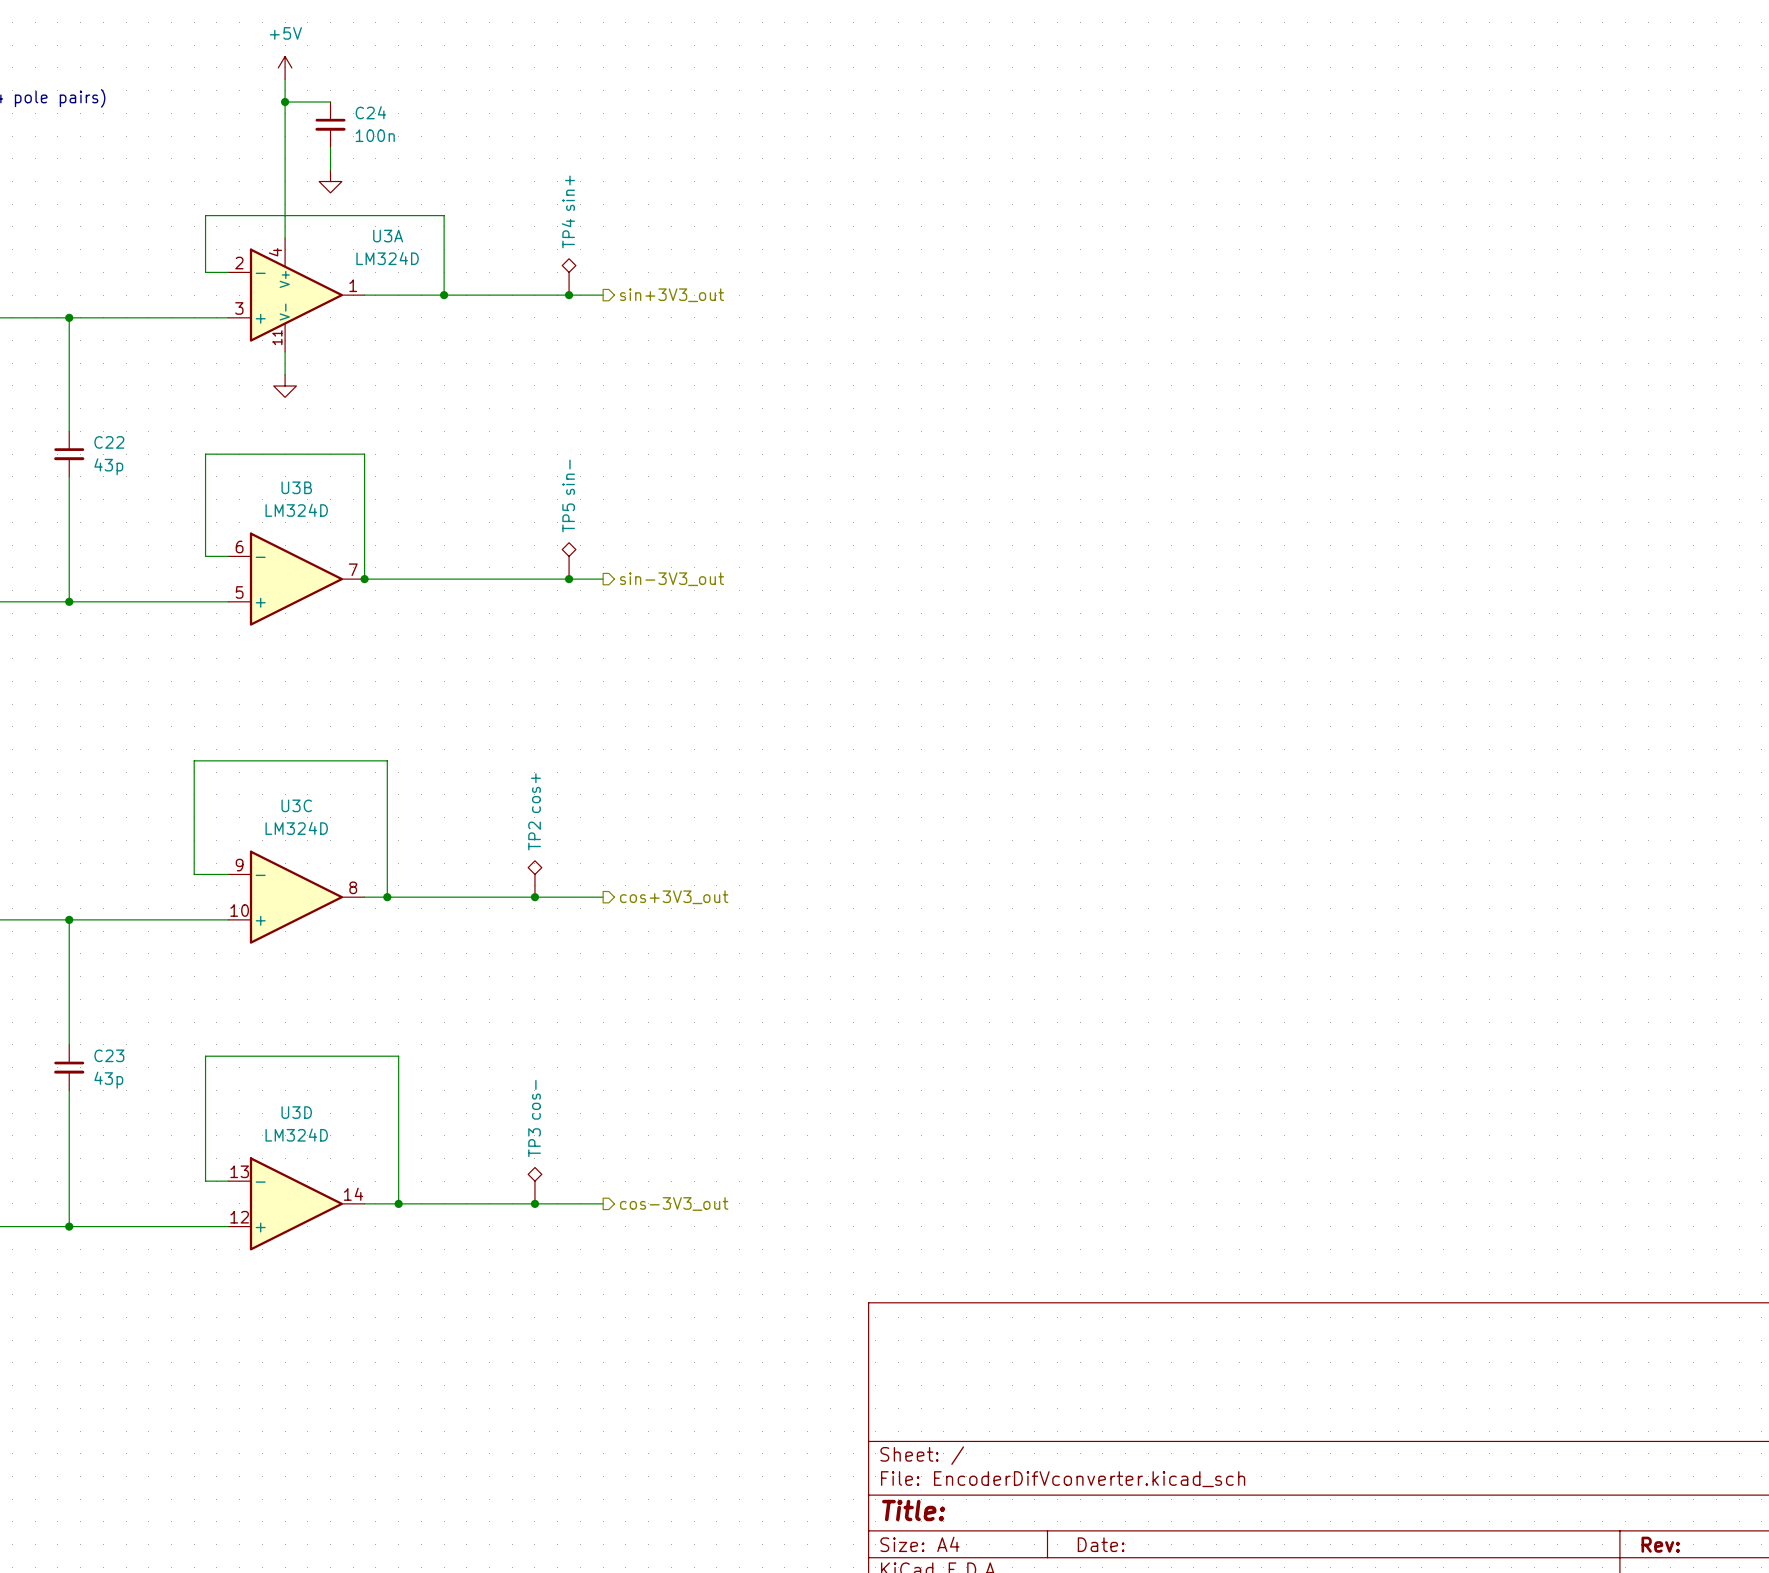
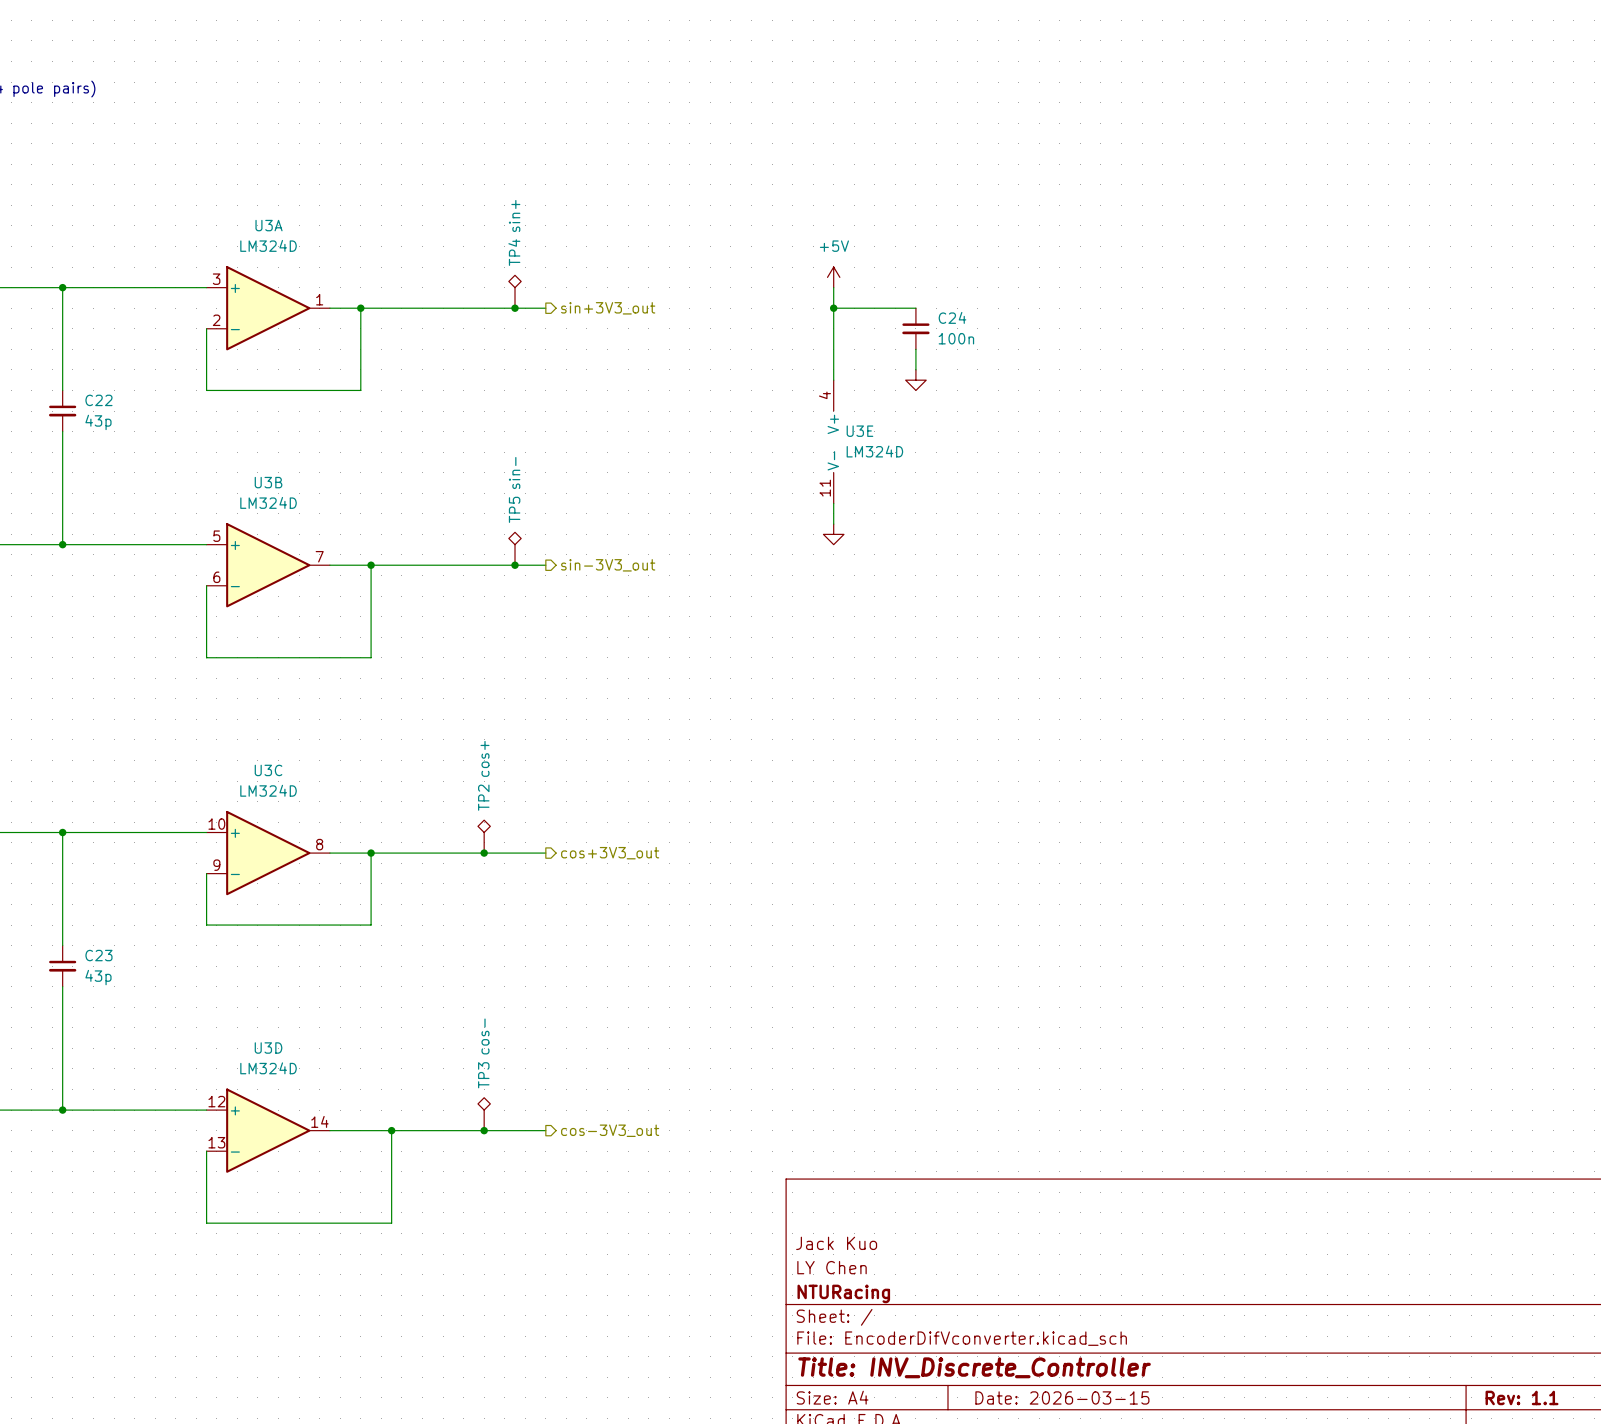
power symbol: +5V (285, 67) -> none
wire: (285, 79) (285, 238) -> none
wire: (285, 102) (330, 102) -> none
junction: (285, 102) -> none
C24 position: (330, 124) -> (915, 328)
wire: (330, 147) (330, 170) -> none
power symbol: (330, 181) -> none
U3A name position: U3A (388, 236) -> U3A (269, 225)
U3A symbol: [228, 238, 365, 352] -> [206, 266, 330, 351]
U3A value position: LM324D (387, 258) -> LM324D (268, 245)
wire: (228, 272) (205, 272) (205, 215) (444, 215) (444, 295) -> none
TP4 position: (569, 276) -> (515, 291)
wire: (364, 295) (603, 295) -> (329, 308) (545, 308)
junction: (444, 295) -> none
junction position: (569, 295) -> (515, 308)
hierarchical label position: sin+3V3_out (672, 295) -> sin+3V3_out (608, 308)
power symbol: none -> +5V (833, 277)
wire: none -> (833, 287) (833, 380)
wire: none -> (360, 308) (360, 390) (206, 390) (206, 328)
junction: none -> (360, 308)
wire: none -> (833, 308) (915, 308)
junction: none -> (833, 308)
power symbol: (285, 385) -> none
wire: none -> (915, 349) (915, 369)
power symbol: none -> (915, 380)
U3E: none -> LM324D (833, 441)
wire: (228, 556) (205, 556) (205, 454) (364, 454) (364, 579) (603, 579) -> none
wire: none -> (833, 503) (833, 524)
TP5 position: (569, 560) -> (515, 548)
U3B flip: as is (296, 579) -> up-down (268, 565)
junction: (364, 579) -> none
junction position: (569, 579) -> (515, 565)
hierarchical label position: sin-3V3_out (672, 579) -> sin-3V3_out (608, 565)
power symbol: none -> (833, 534)
wire: none -> (329, 565) (545, 565)
wire: none -> (371, 565) (371, 657) (206, 657) (206, 585)
junction: none -> (371, 565)
wire: (228, 874) (194, 874) (194, 760) (387, 760) (387, 897) -> none
TP2 position: (534, 878) -> (484, 836)
U3C flip: as is (296, 897) -> up-down (268, 853)
wire: (364, 897) (603, 897) -> (329, 853) (545, 853)
junction position: (387, 897) -> (371, 853)
junction position: (534, 897) -> (484, 853)
hierarchical label position: cos+3V3_out (674, 897) -> cos+3V3_out (610, 853)
wire: none -> (371, 853) (371, 925) (206, 925) (206, 873)
wire: (228, 1181) (205, 1181) (205, 1056) (398, 1056) (398, 1203) -> none
TP3 position: (534, 1185) -> (484, 1114)
U3D flip: as is (296, 1203) -> up-down (268, 1130)
wire: (364, 1203) (603, 1203) -> (329, 1130) (545, 1130)
junction: (398, 1203) -> none
junction position: (534, 1203) -> (484, 1130)
hierarchical label position: cos-3V3_out (674, 1203) -> cos-3V3_out (610, 1130)
wire: none -> (391, 1130) (391, 1223) (206, 1223) (206, 1151)
junction: none -> (391, 1130)
title block: none -> Jack Kuo (836, 1243)
title block: none -> LY Chen (832, 1267)
title block: none -> NTURacing (843, 1293)
title block: Title: (913, 1510) -> Title: INV_Discrete_Controller (974, 1367)
title block: Date: (1101, 1544) -> Date: 2026-03-15 (1062, 1397)
title block: Rev: (1660, 1544) -> Rev: 1.1 (1522, 1397)

